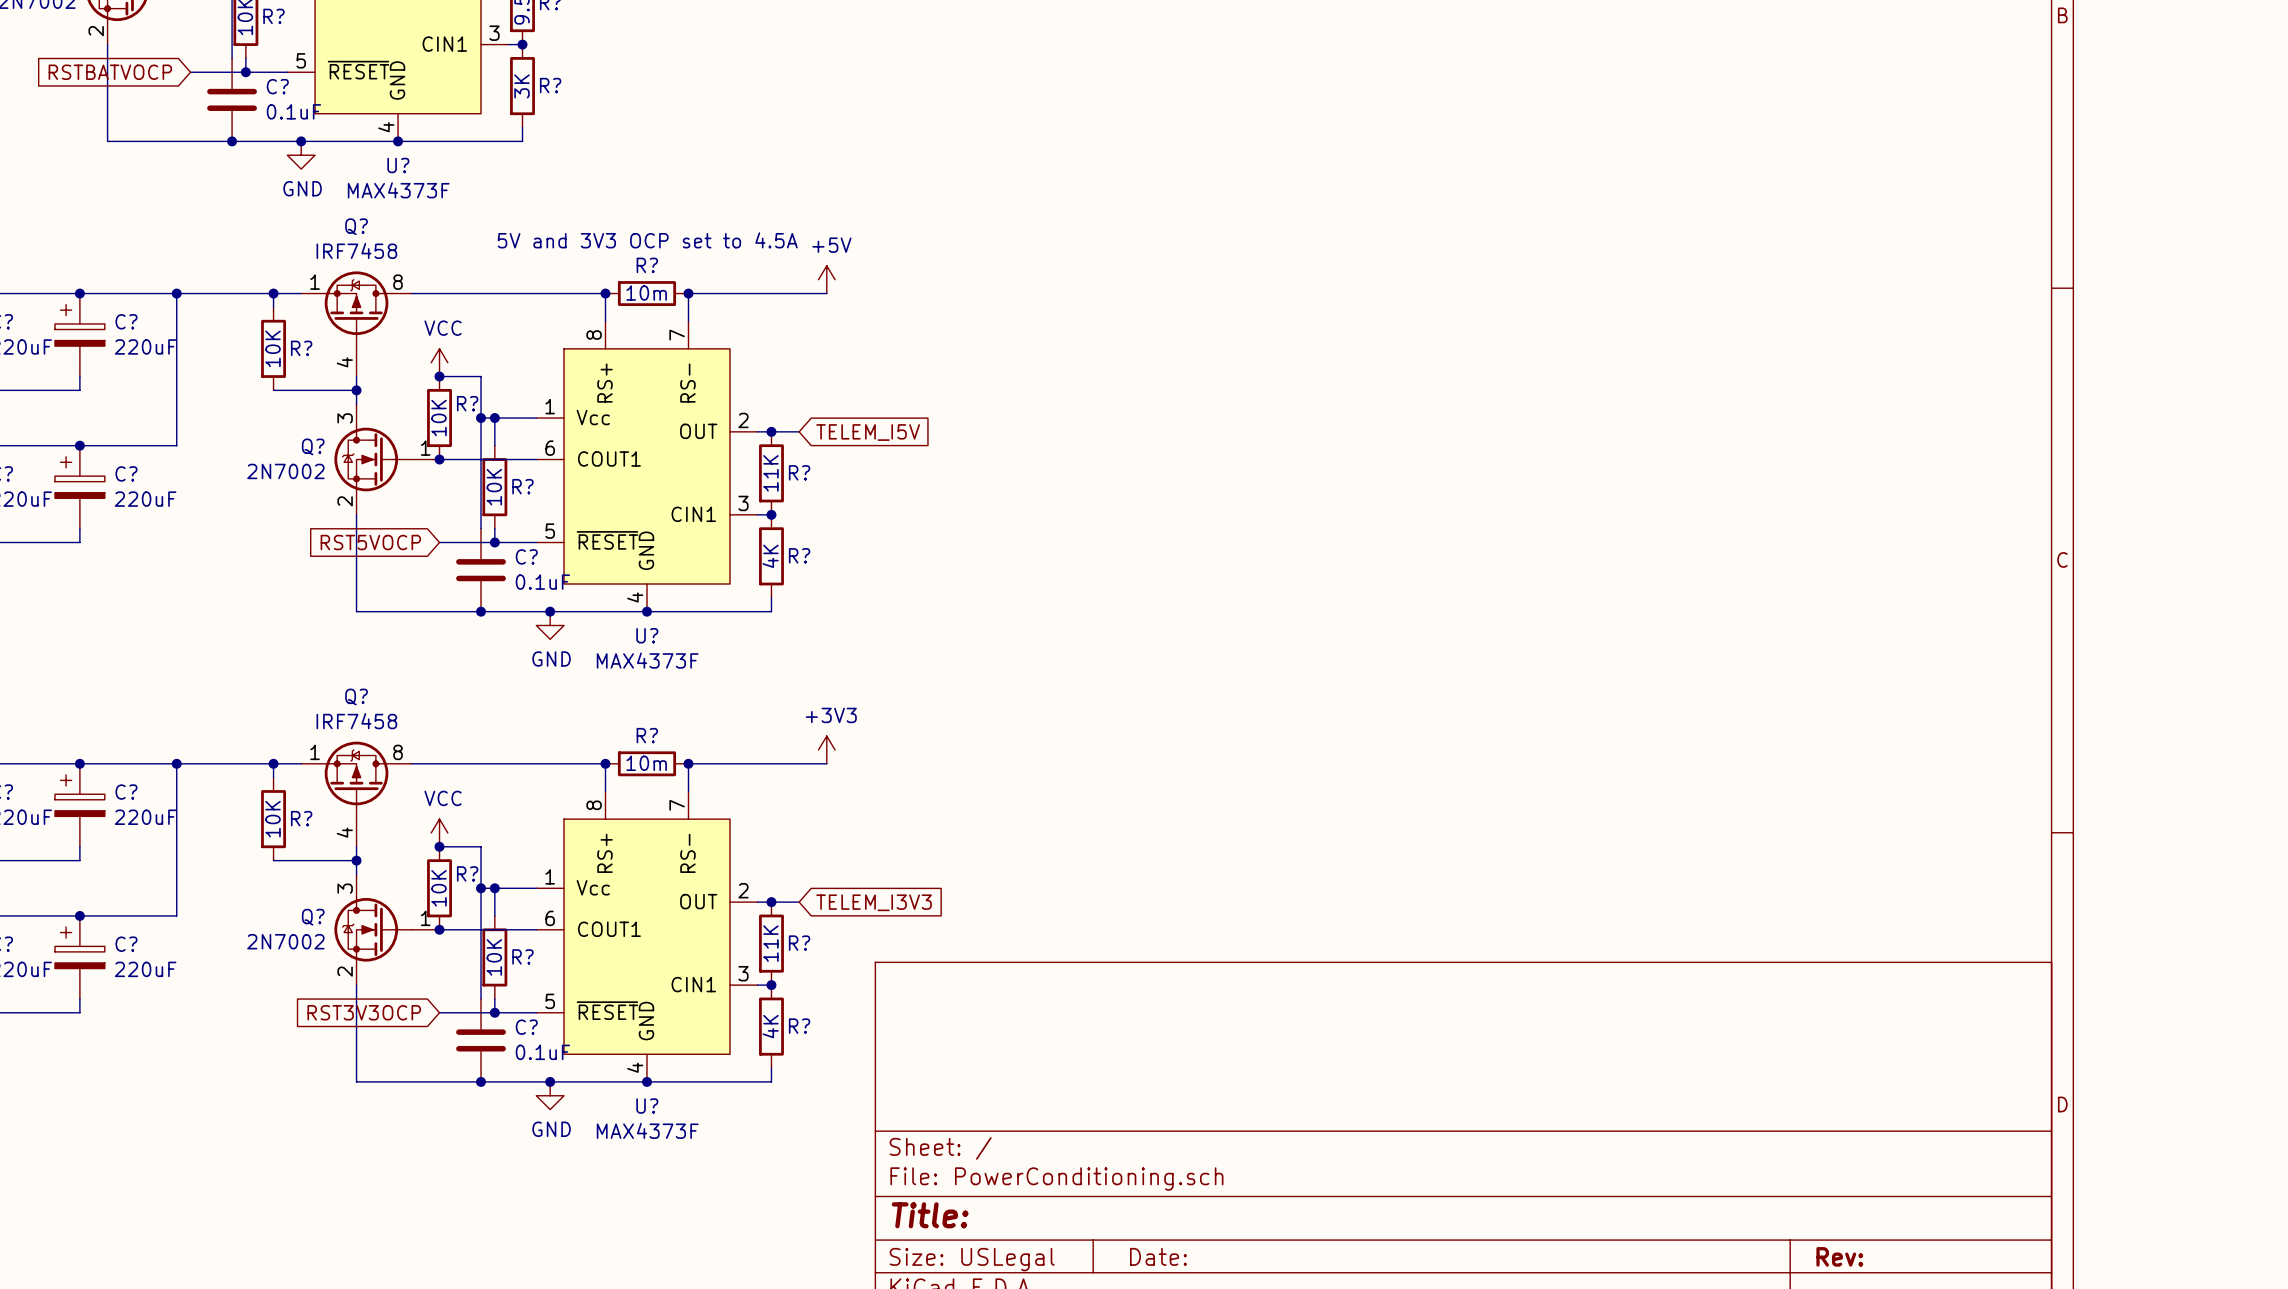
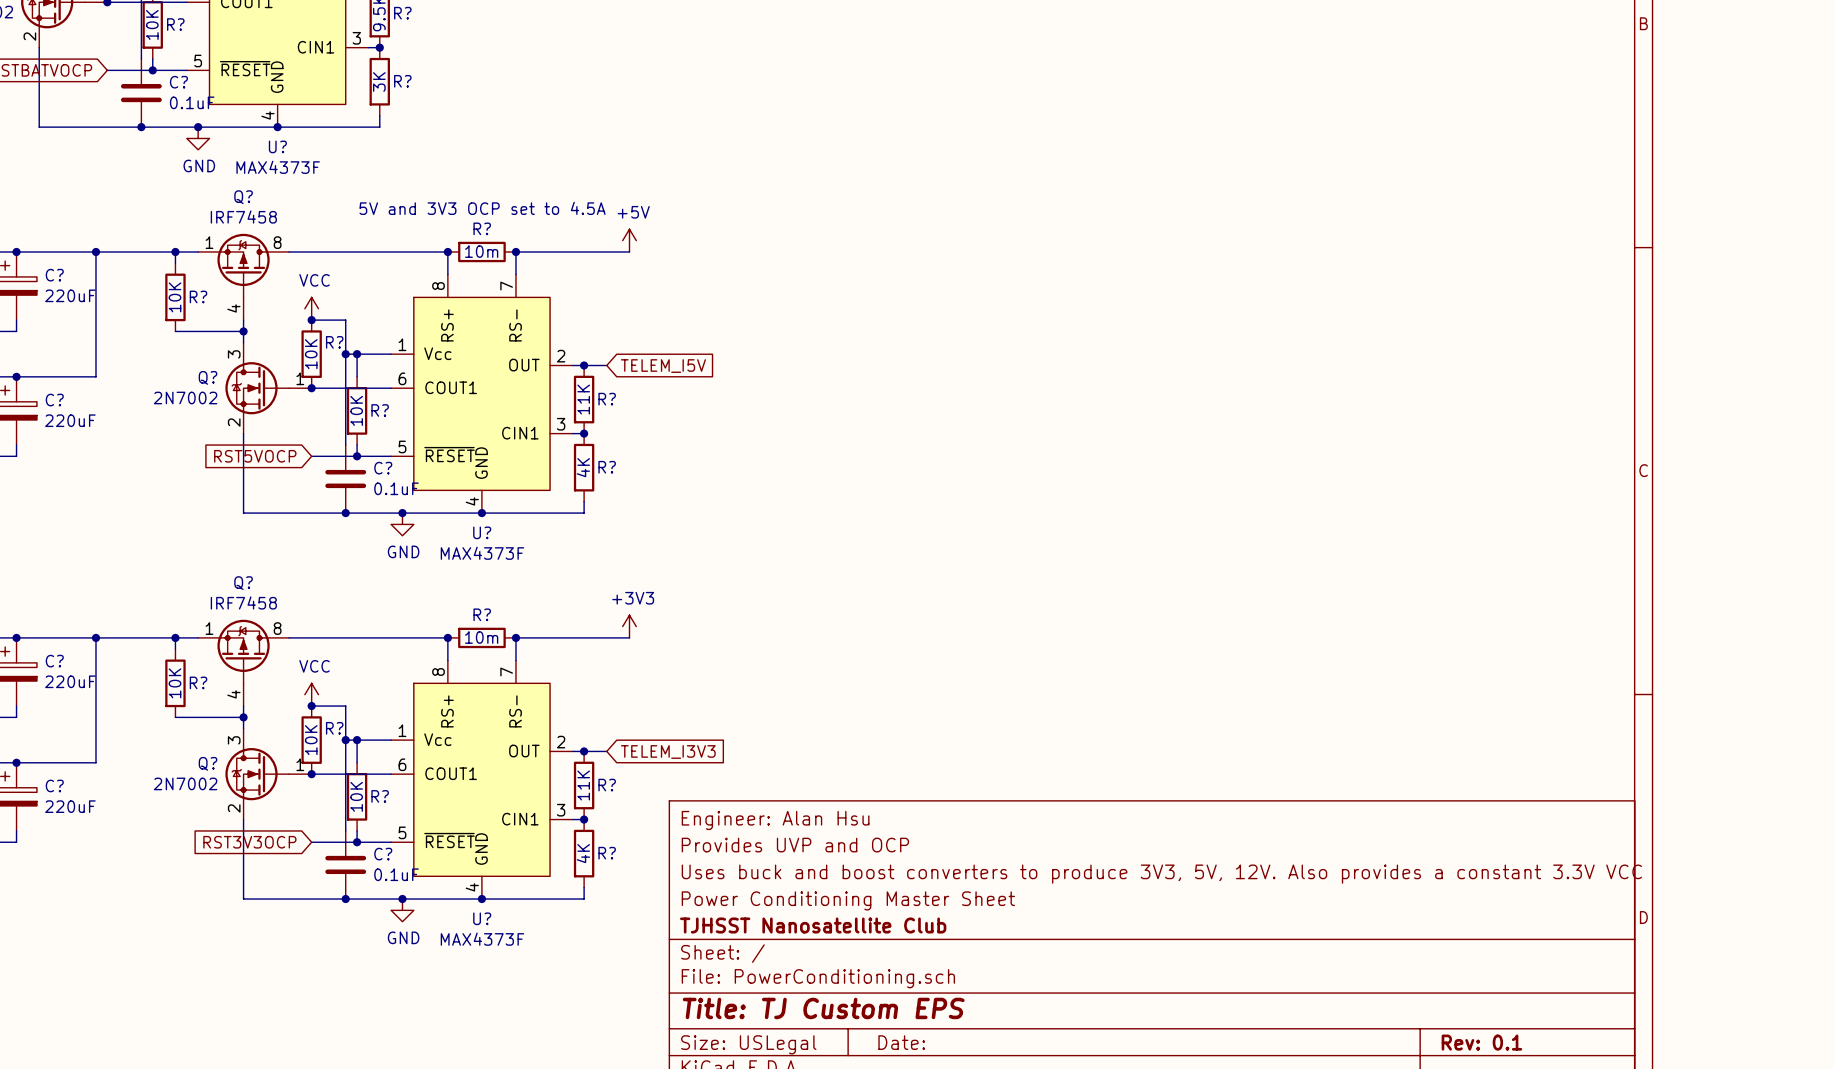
title block: none -> Engineer: Alan Hsu (775, 820)
title block: none -> Provides UVP and OCP (795, 845)
title block: none -> Uses buck and boost converters to produce 3V3, 5V, 12V. Also provides a constant 3.3V VCC (1161, 874)
title block: none -> Power Conditioning Master Sheet (848, 900)
title block: none -> TJHSST Nanosatellite Club (813, 925)
title block: Title: (930, 1215) -> Title: TJ Custom EPS (823, 1008)
title block: Rev: (1839, 1256) -> Rev: 0.1 (1481, 1042)

